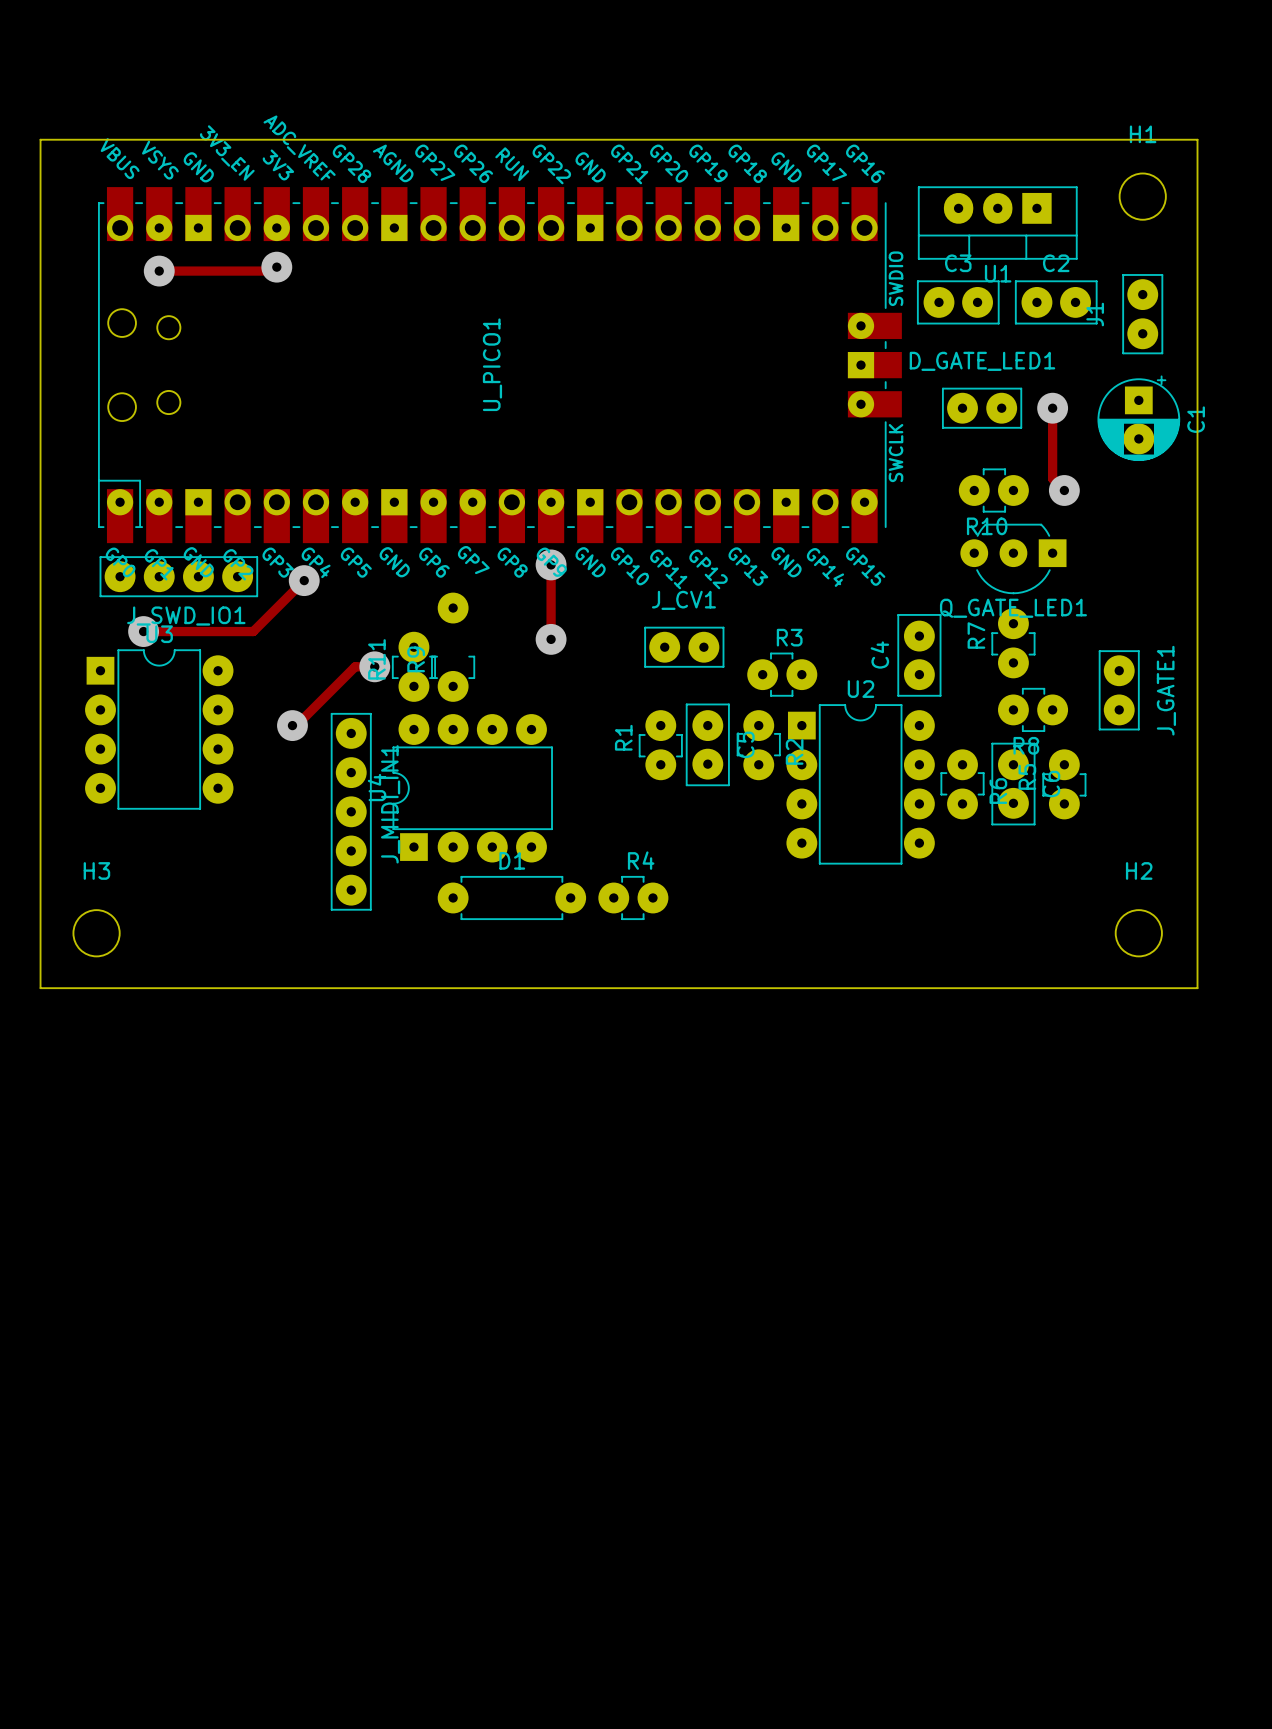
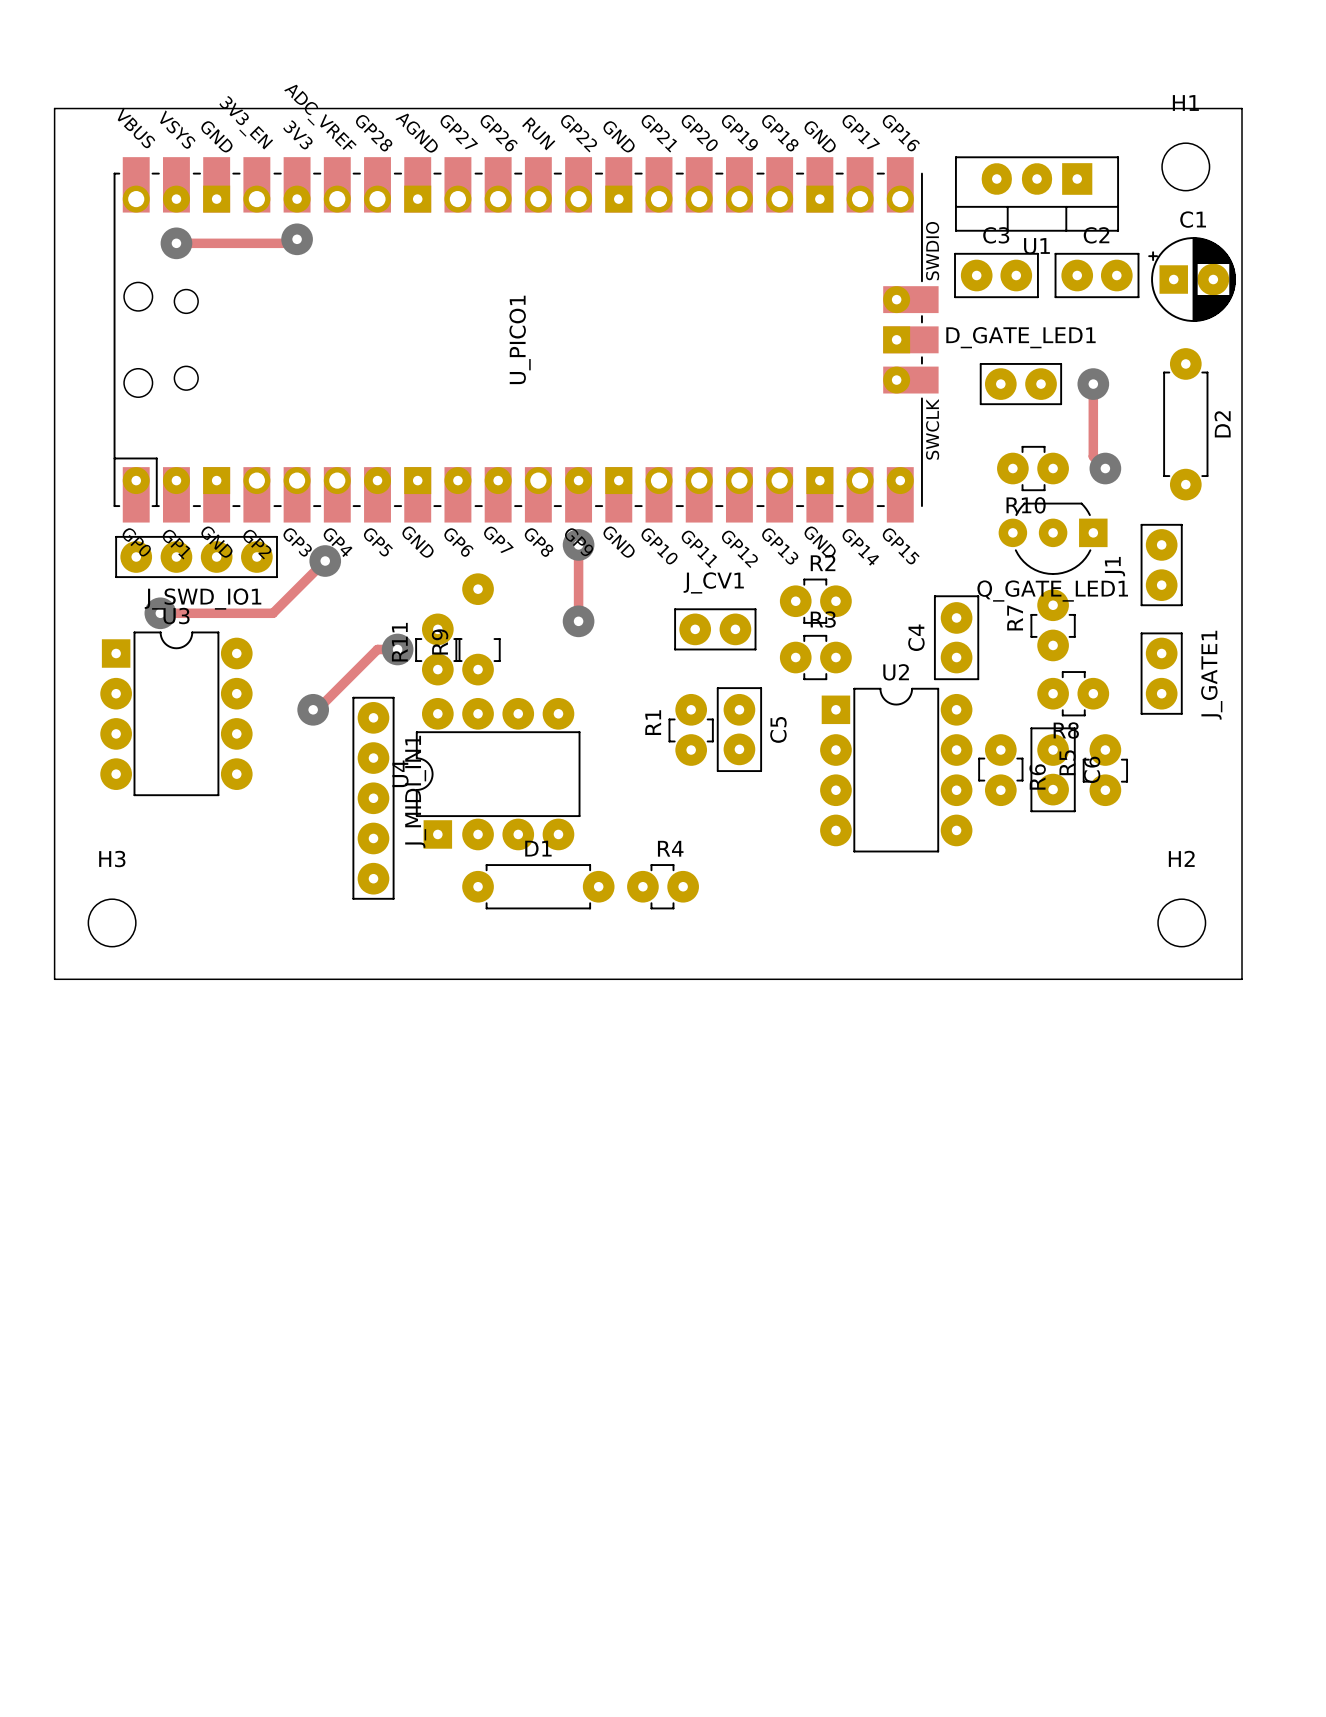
J1 position: (1142, 314) -> (1161, 565)
C1 rotation: 0° (1138, 418) -> 90° counterclockwise (1192, 279)
C1 position: (1138, 418) -> (1192, 279)
D2: none -> (1185, 424)
R2 rotation: 0° (758, 745) -> 90° counterclockwise (815, 601)
R2 position: (758, 745) -> (815, 601)

